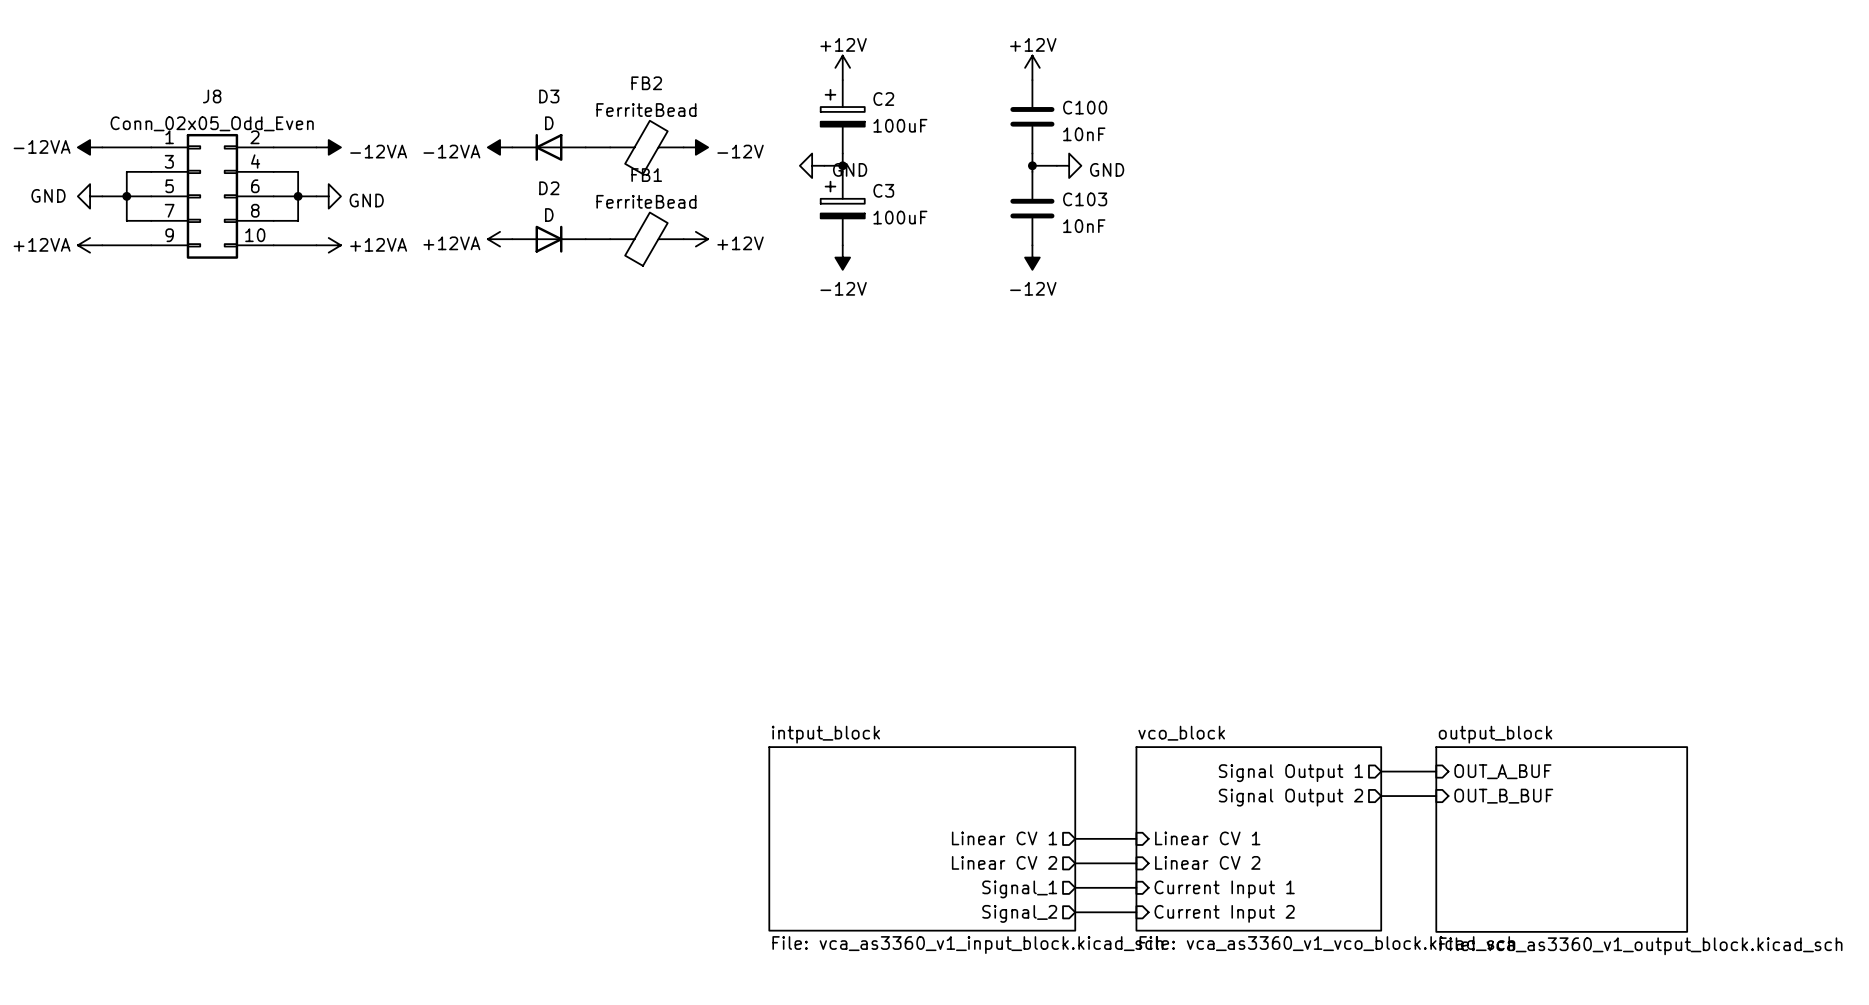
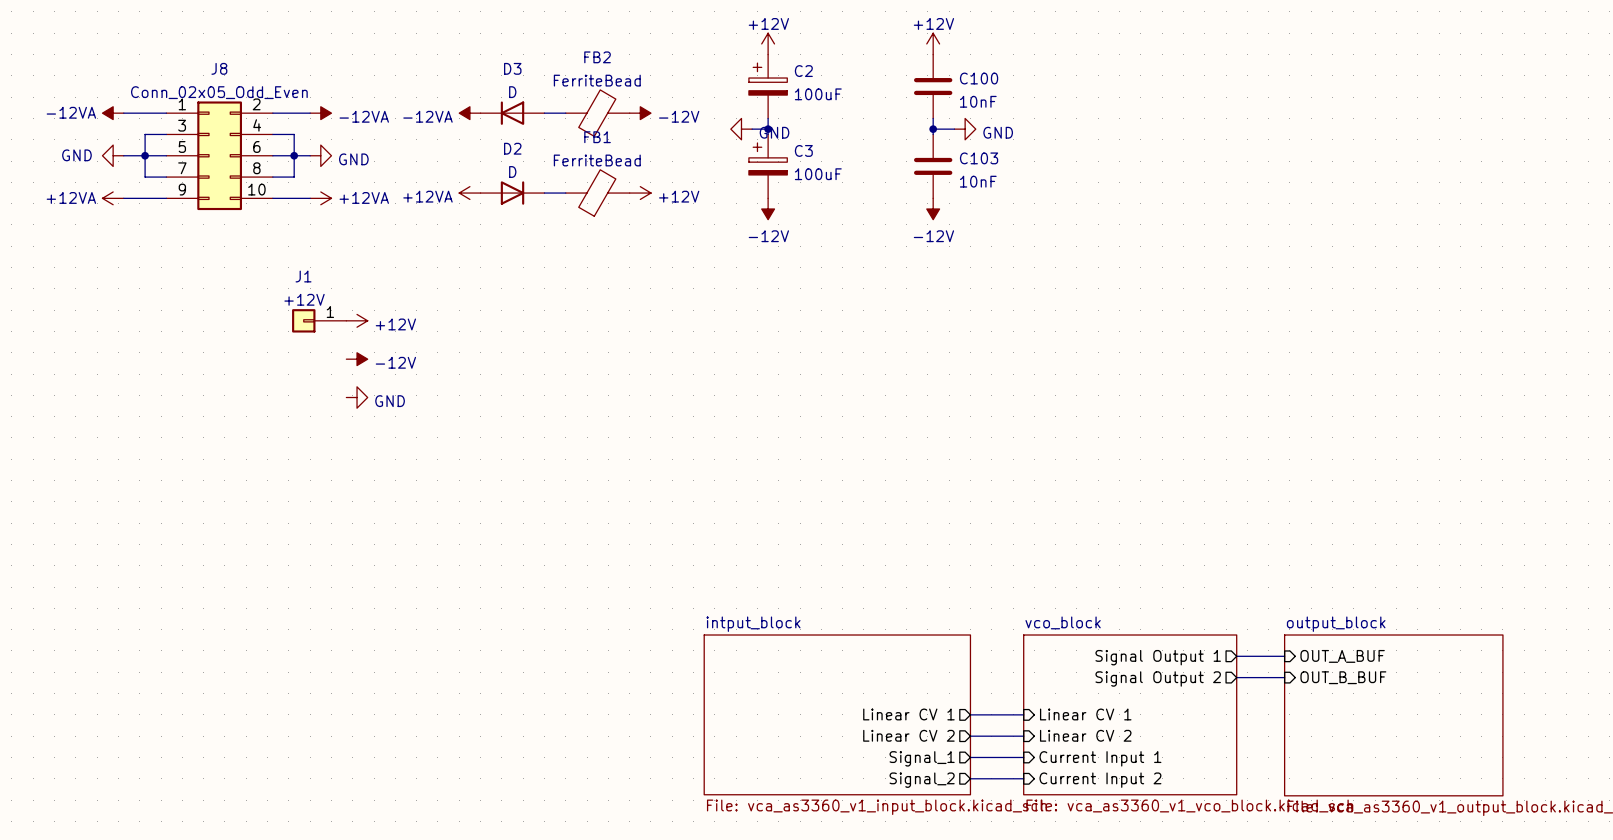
J1: none -> +12V (319, 320)
power symbol: none -> +12V (357, 320)
power symbol: none -> -12V (357, 359)
power symbol: none -> GND (357, 397)

